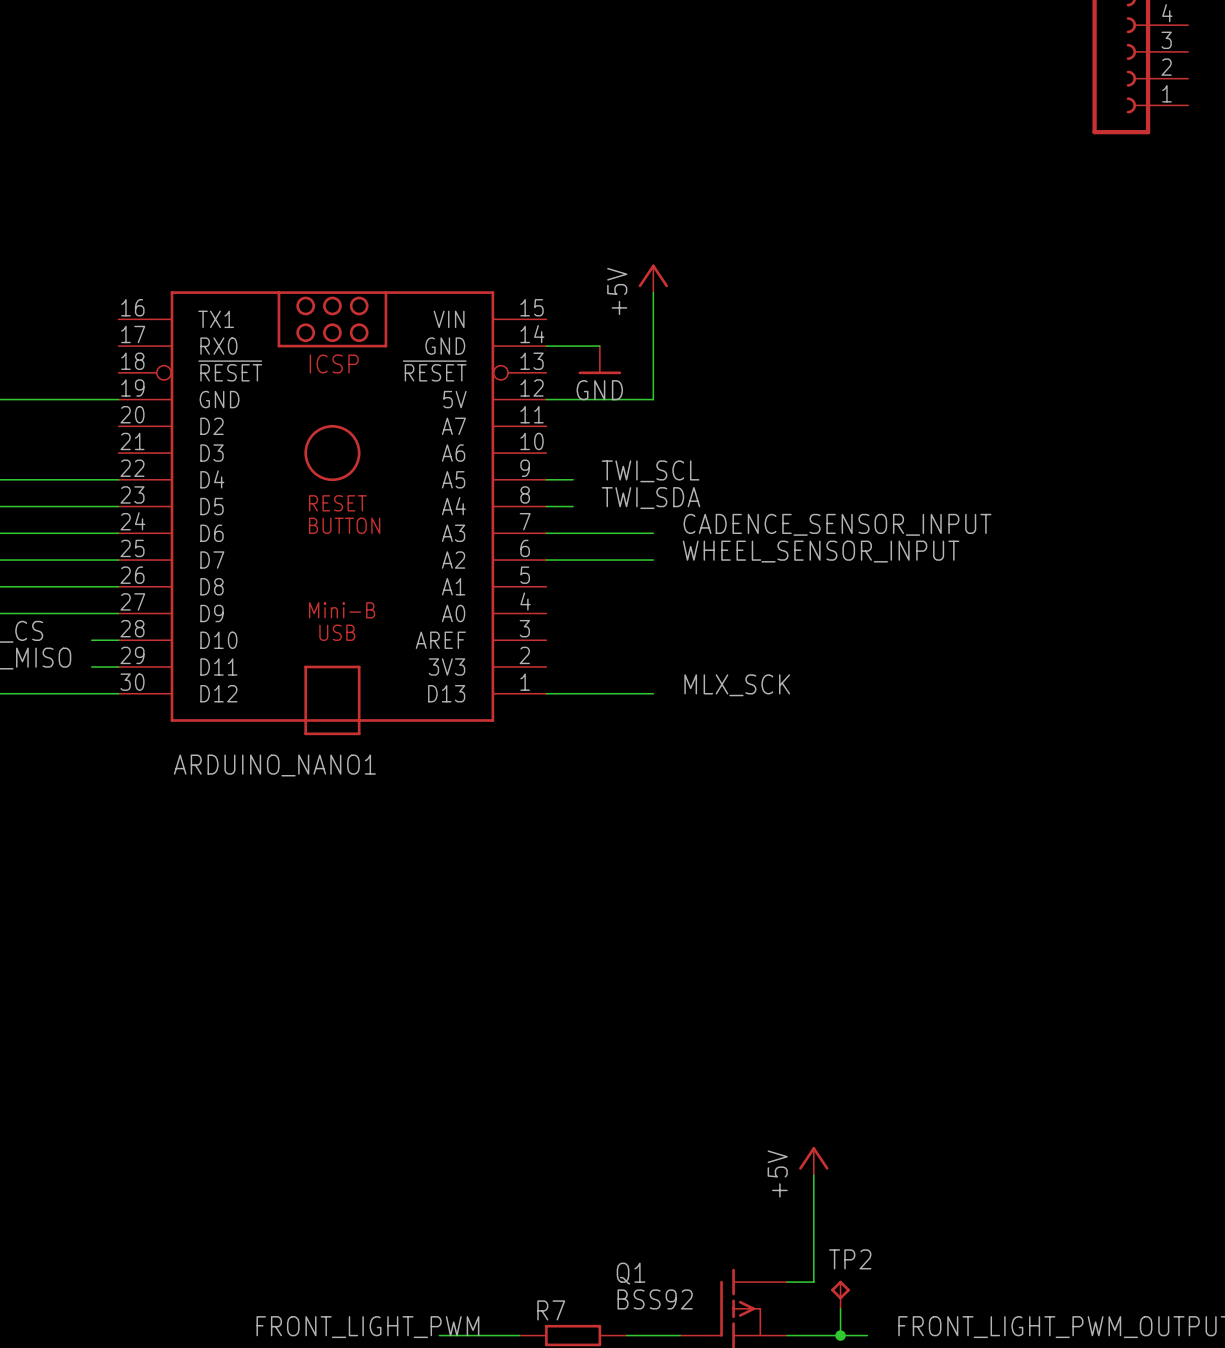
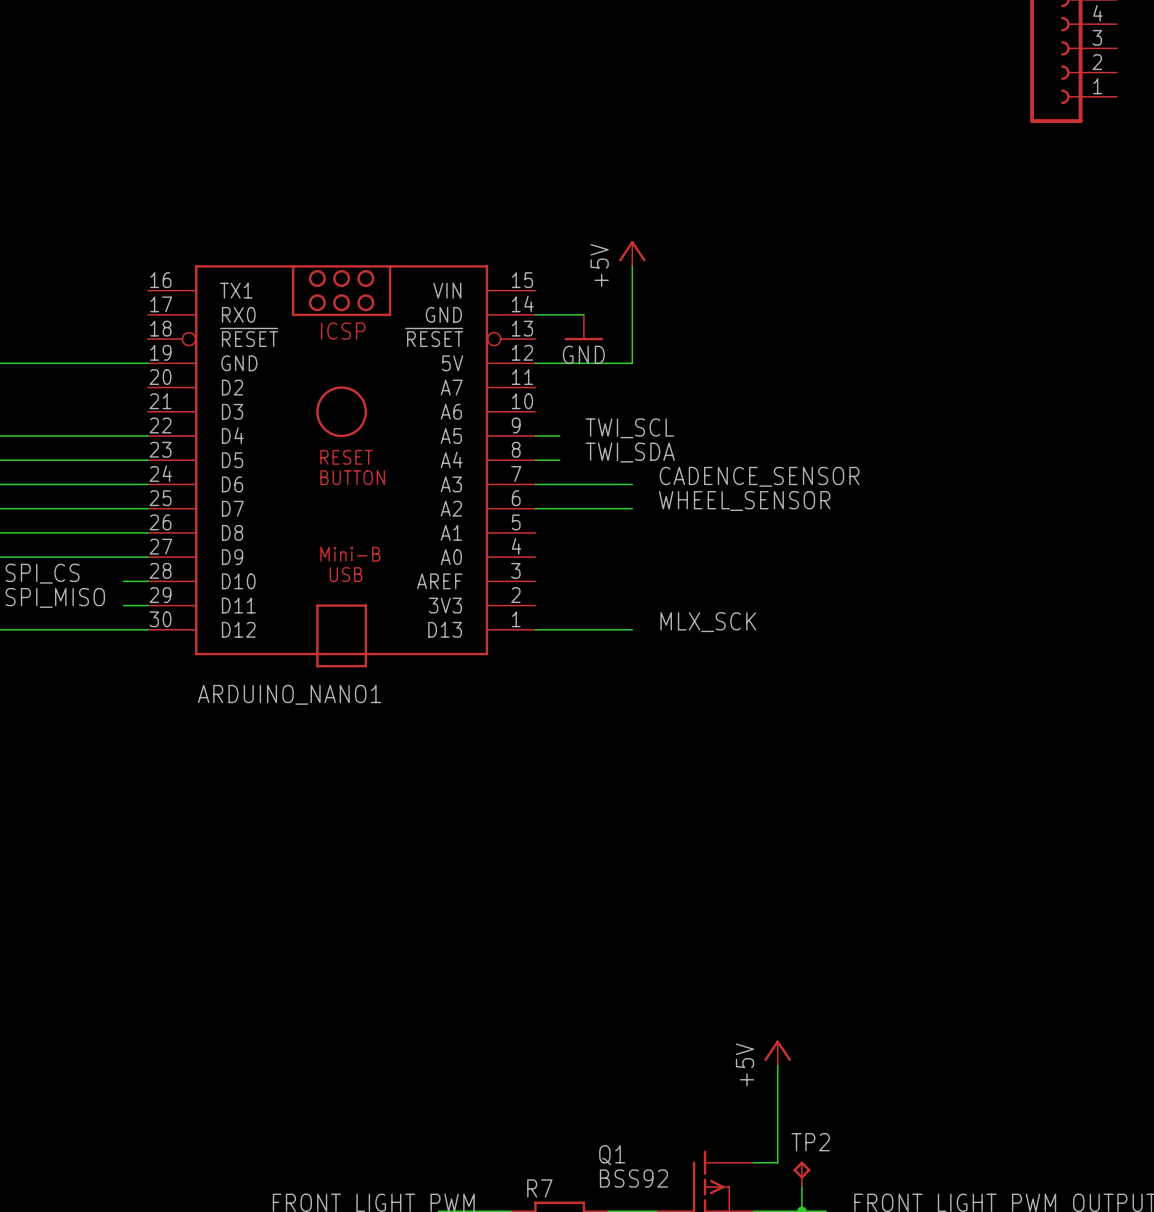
label: CADENCE_SENSOR_INPUT (837, 524) -> CADENCE_SENSOR (759, 476)
label: WHEEL_SENSOR_INPUT (821, 551) -> WHEEL_SENSOR (744, 501)

